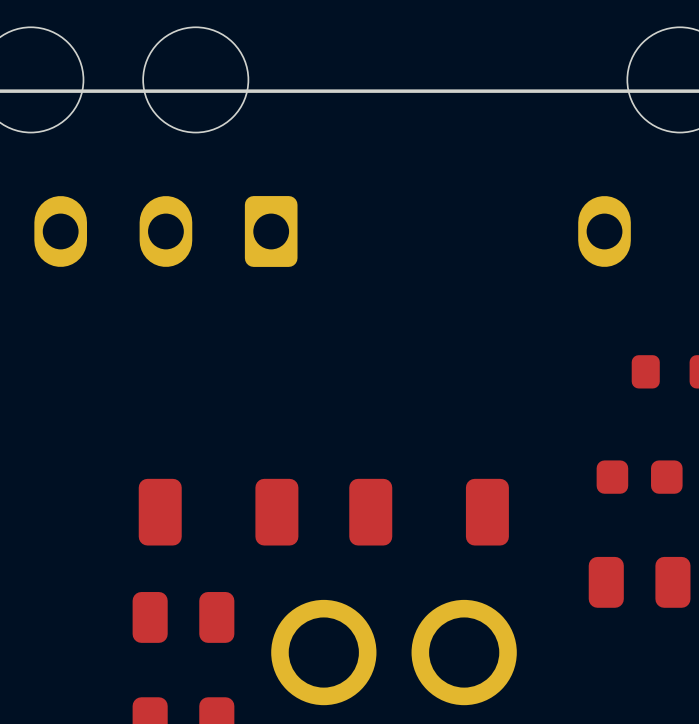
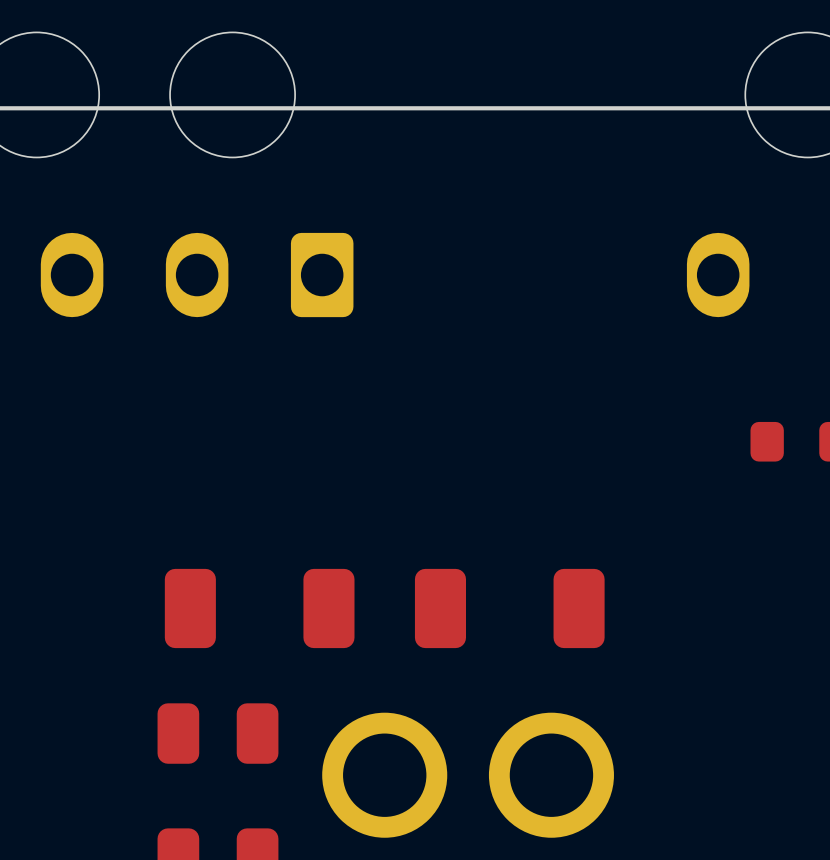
part: (639, 477) -> none
part: (639, 582) -> none

